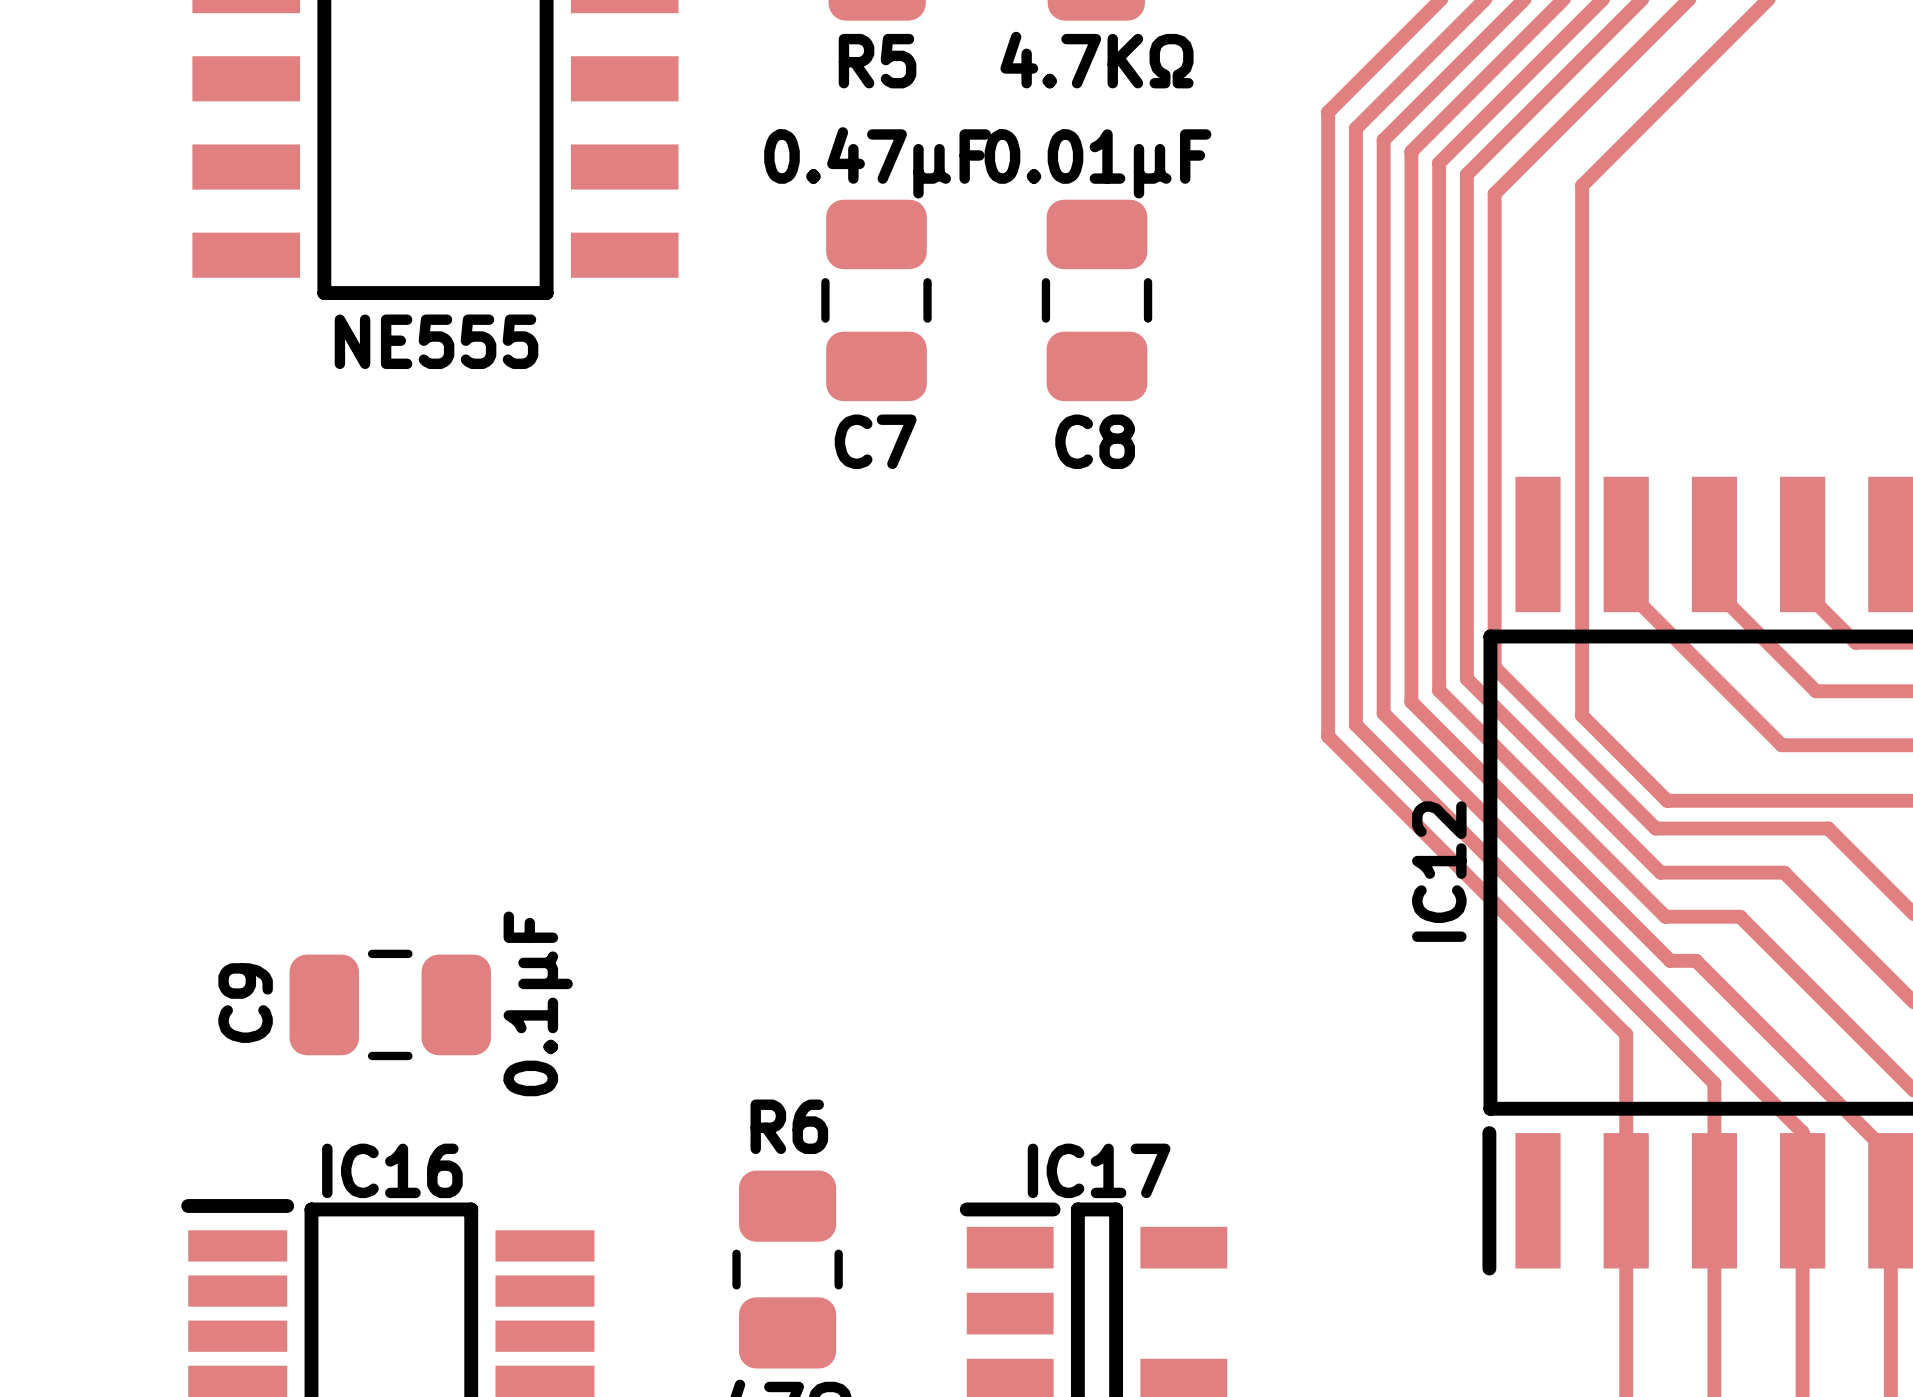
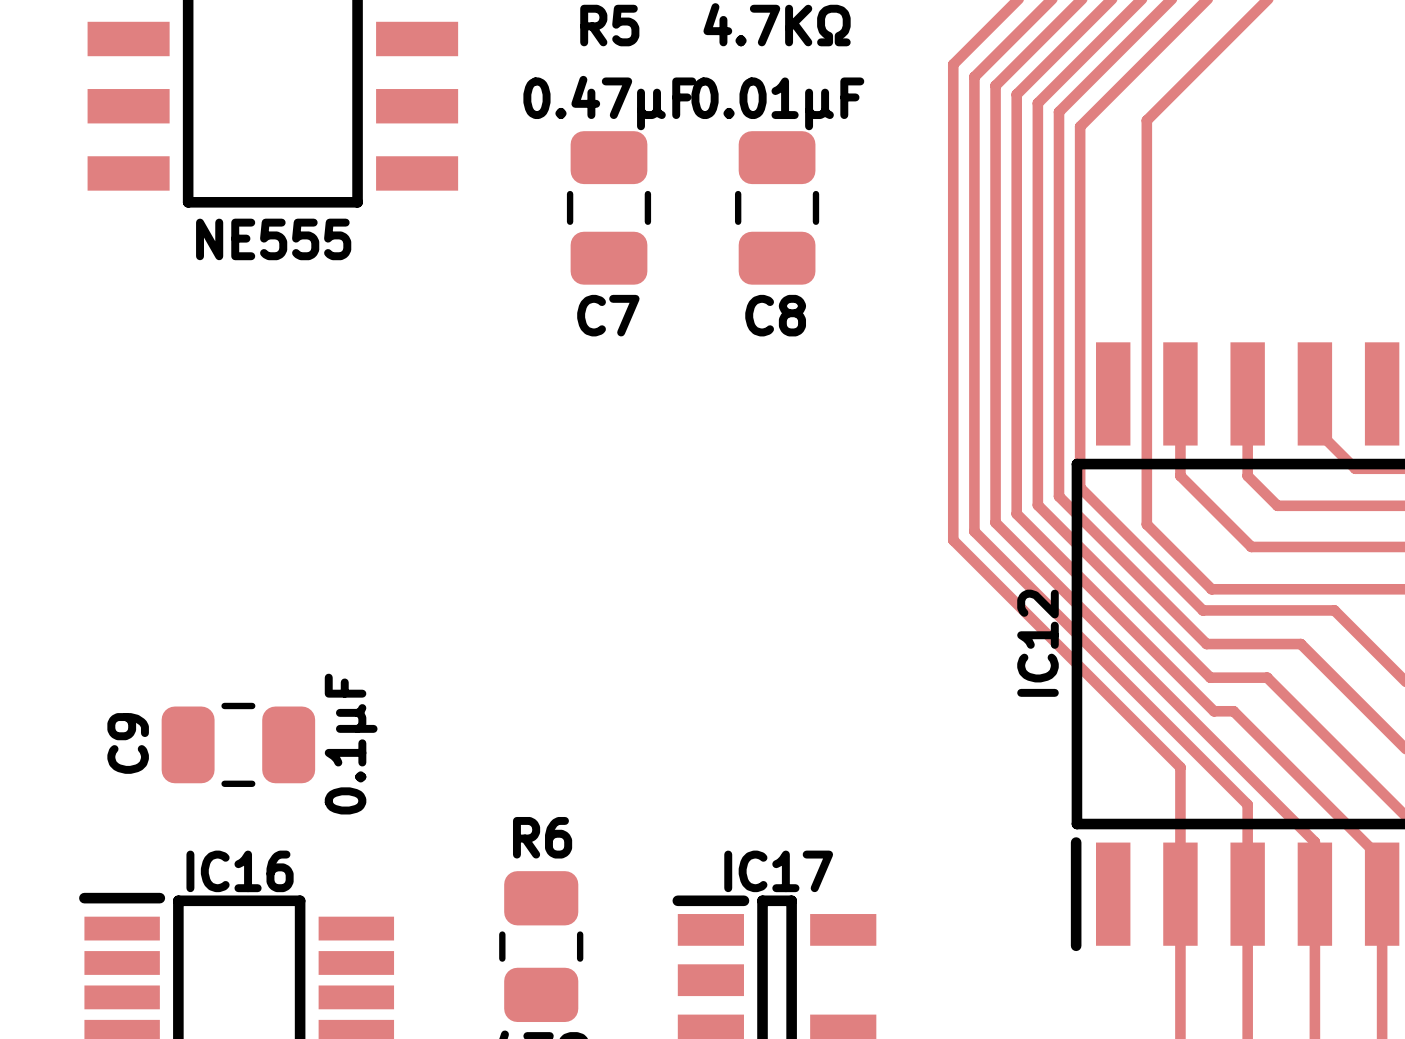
track: (1626, 589) (1781, 745) -> (1180, 428) (1180, 475) (1251, 546) (1299, 546)
track: (1714, 589) (1816, 691) -> (1247, 428) (1247, 475) (1277, 505) (1325, 505)

